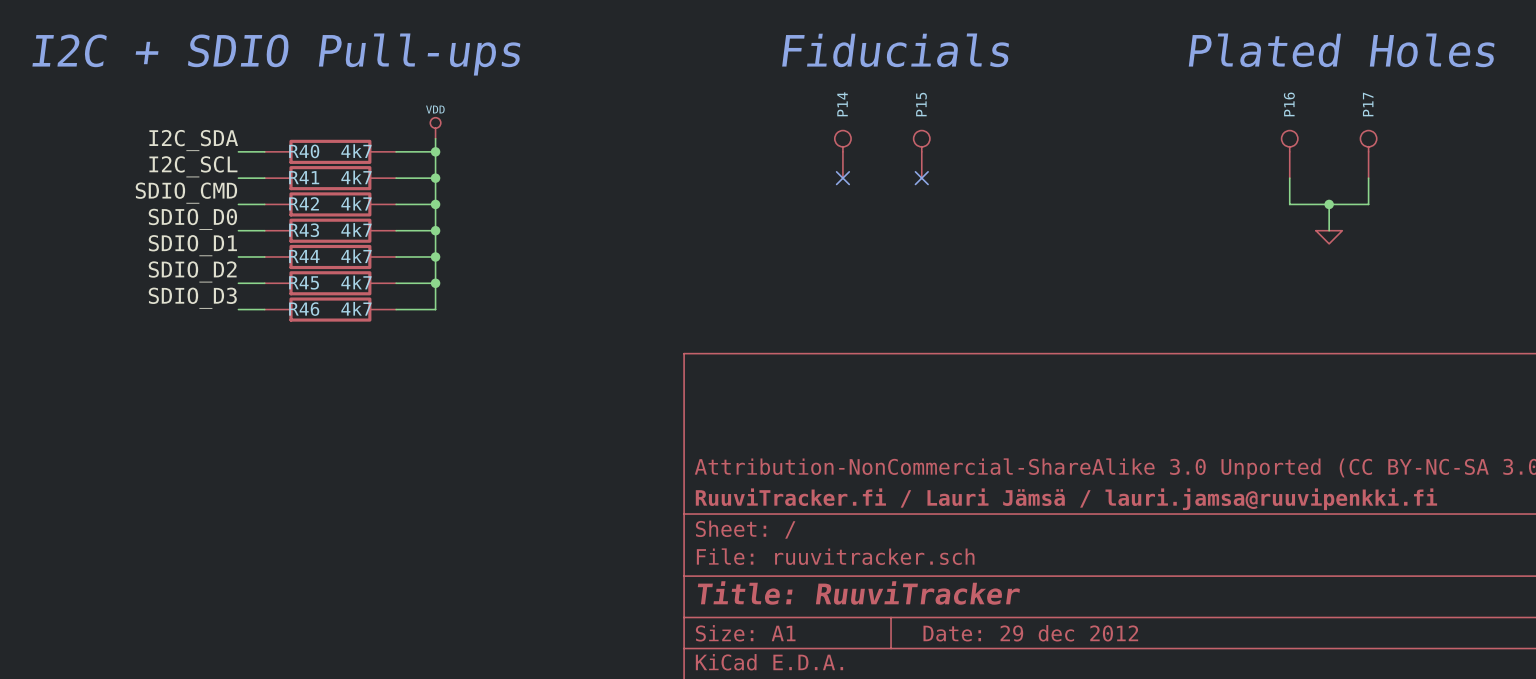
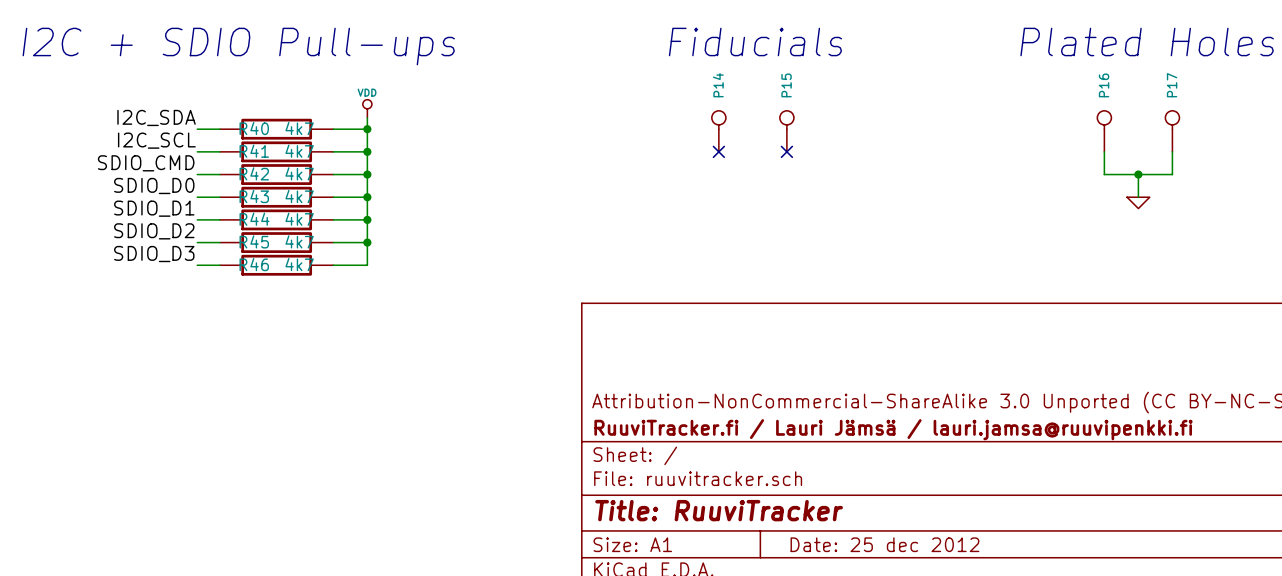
title block: Date: 29 dec 2012 (1030, 633) -> Date: 25 dec 2012 (884, 544)

